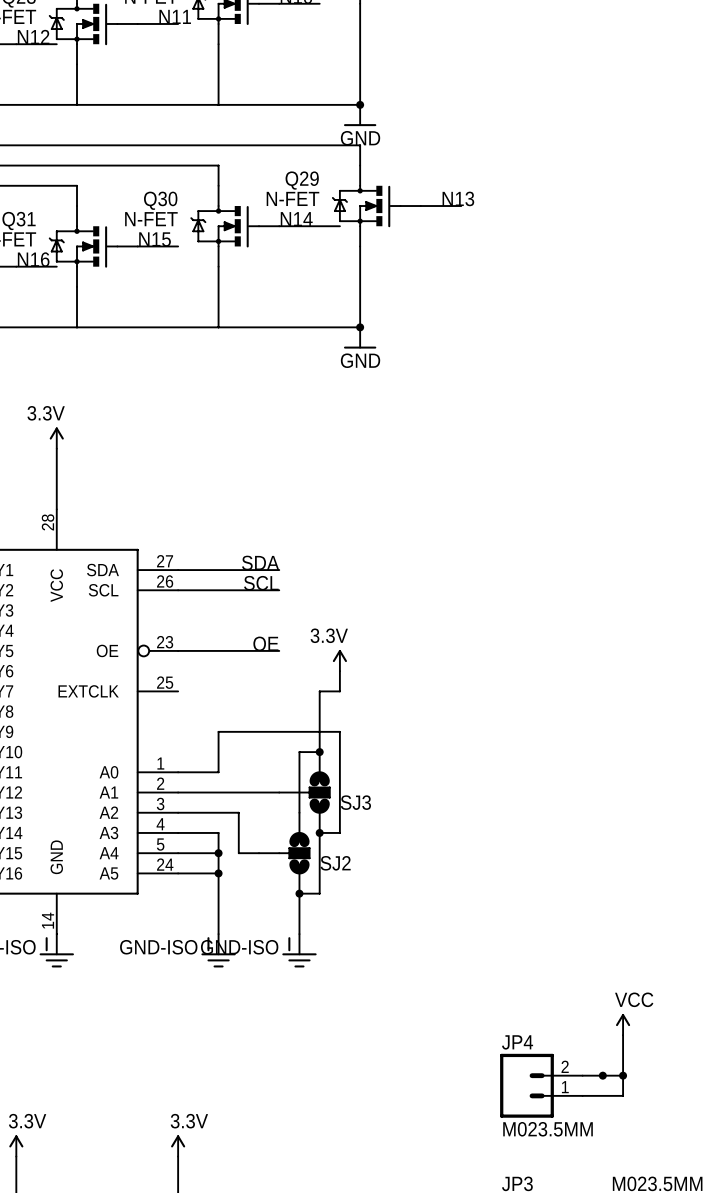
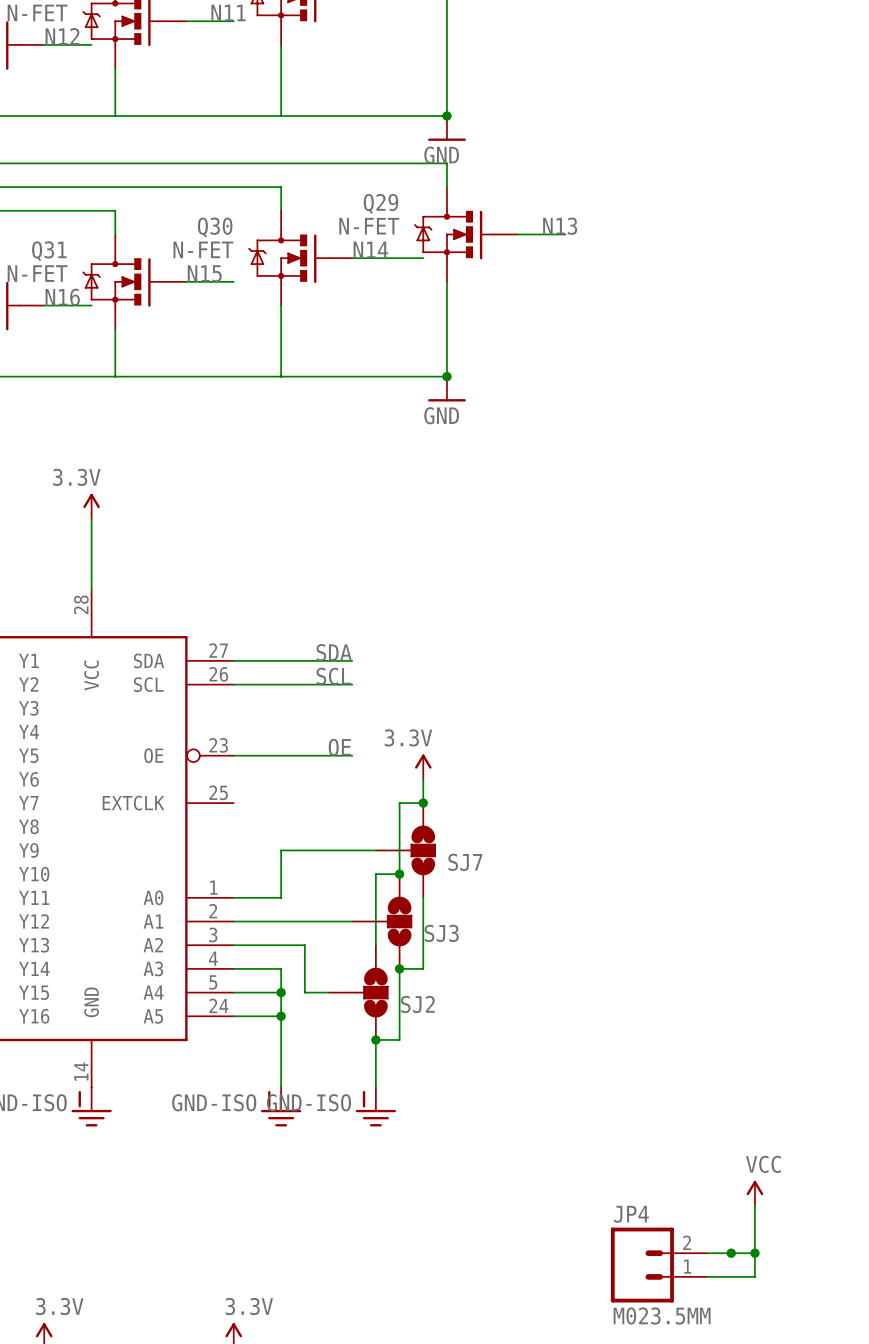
junction: none -> (423, 803)
SJ7: none -> (405, 850)

